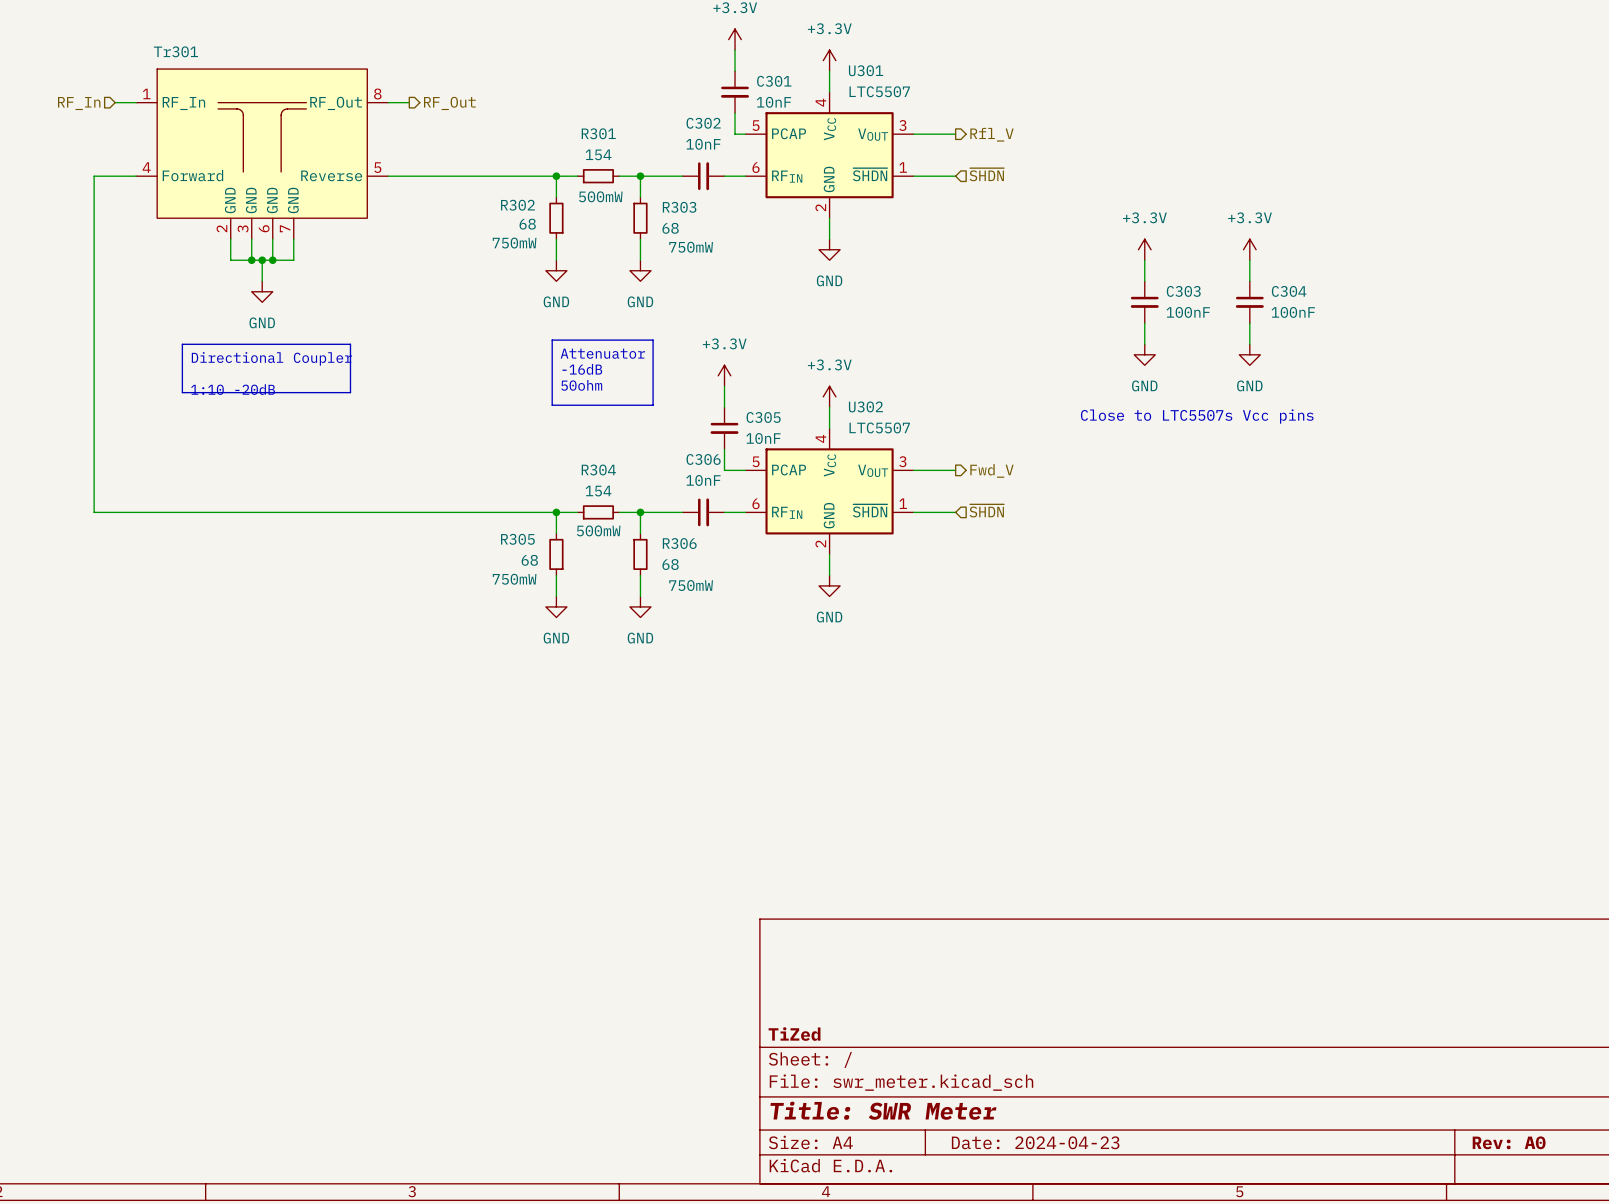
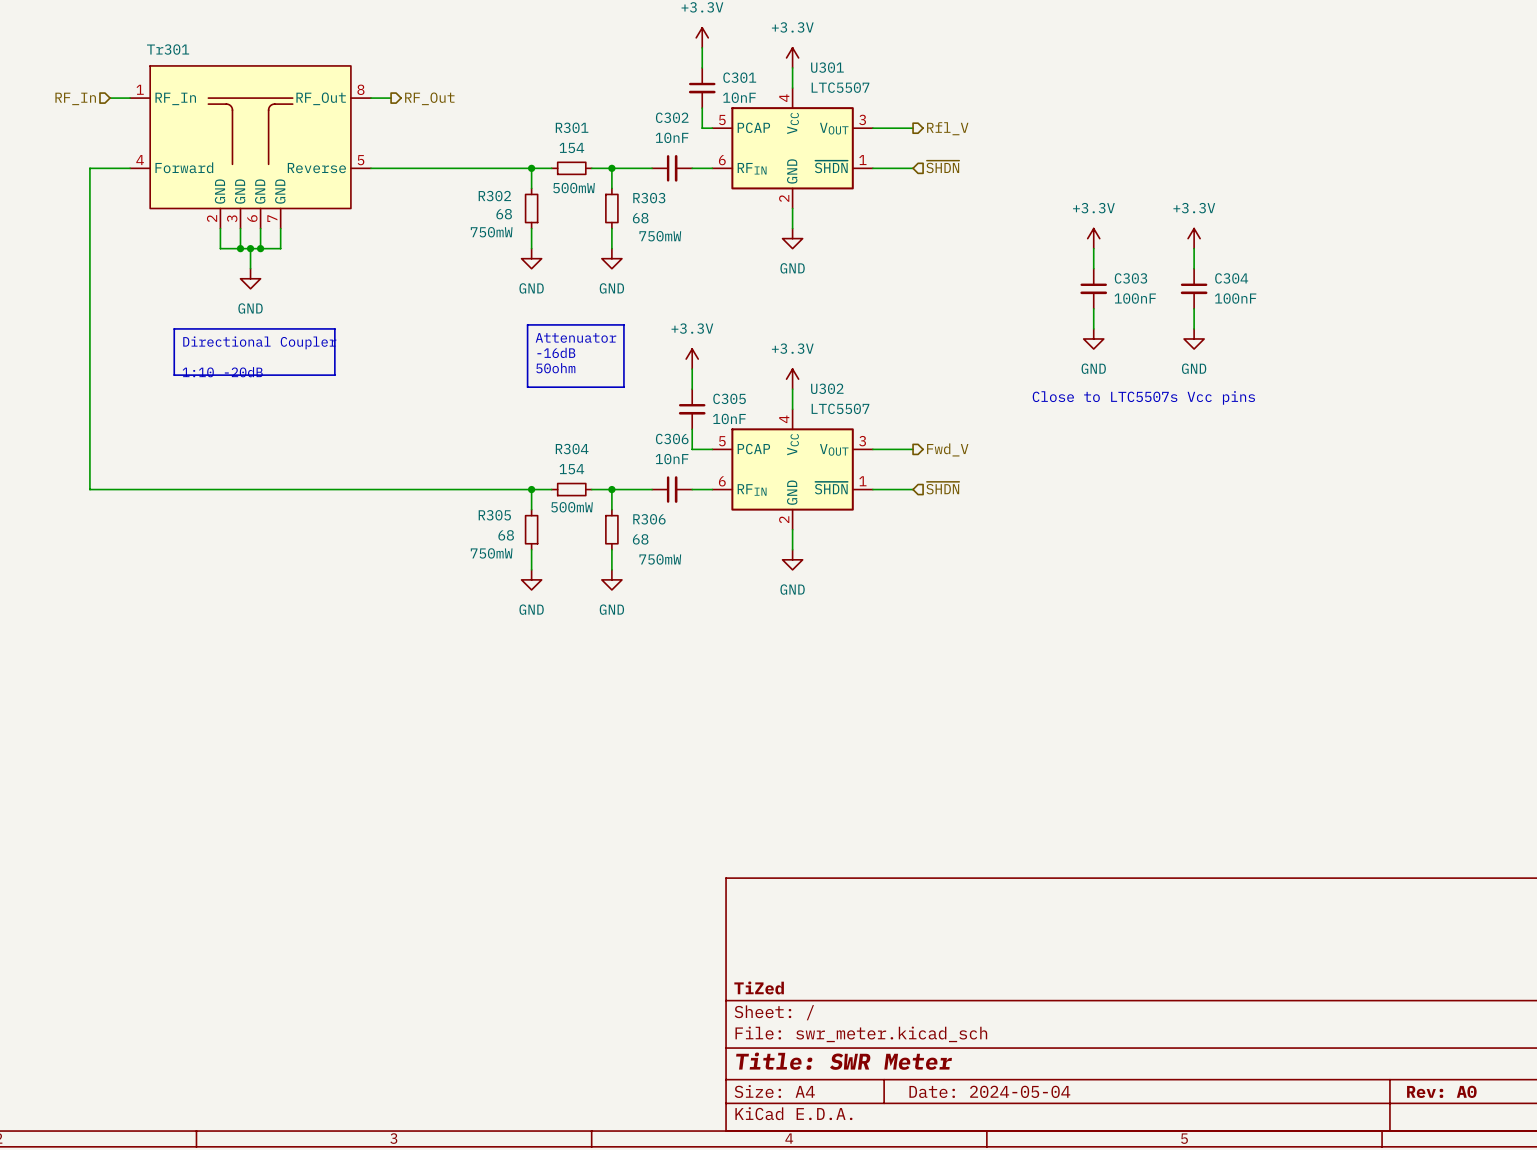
title block: Date: 2024-04-23 (1035, 1142) -> Date: 2024-05-04 (989, 1091)

